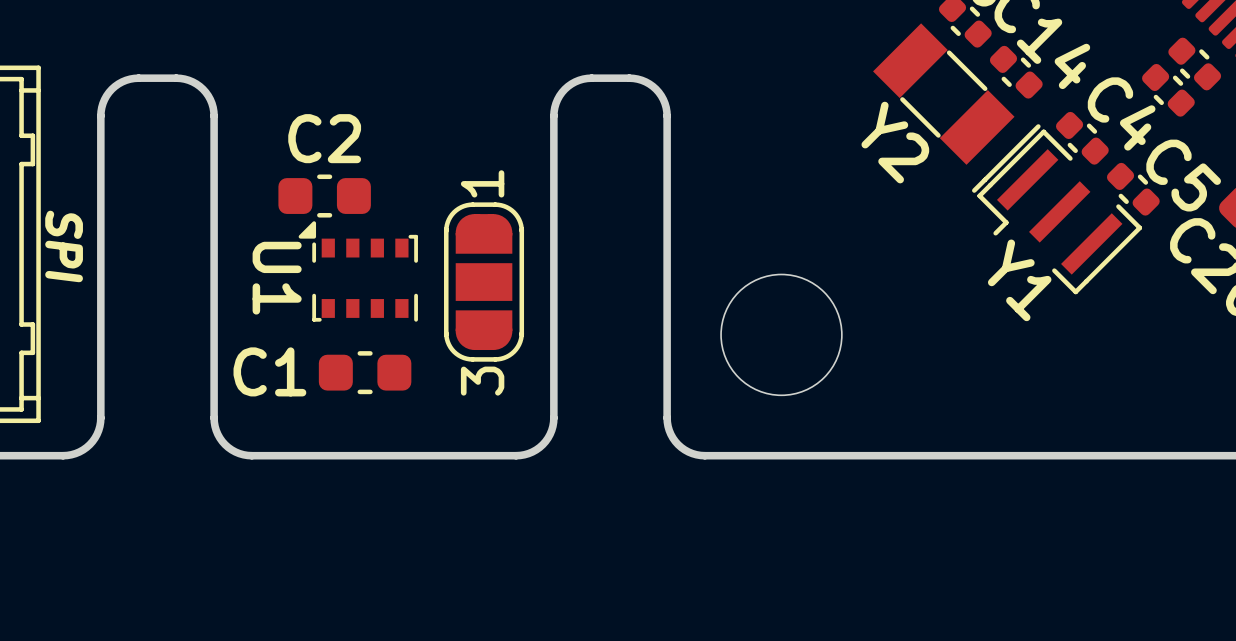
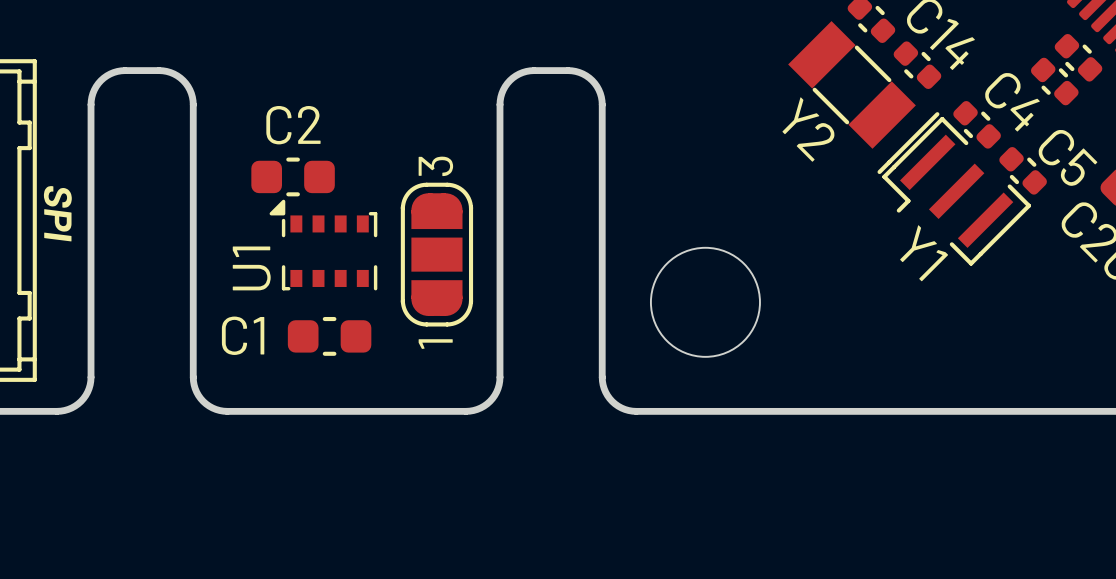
U1 name rotation: 0° (277, 278) -> 180° (251, 268)
part rotation: 0° (484, 282) -> 180° (436, 254)

